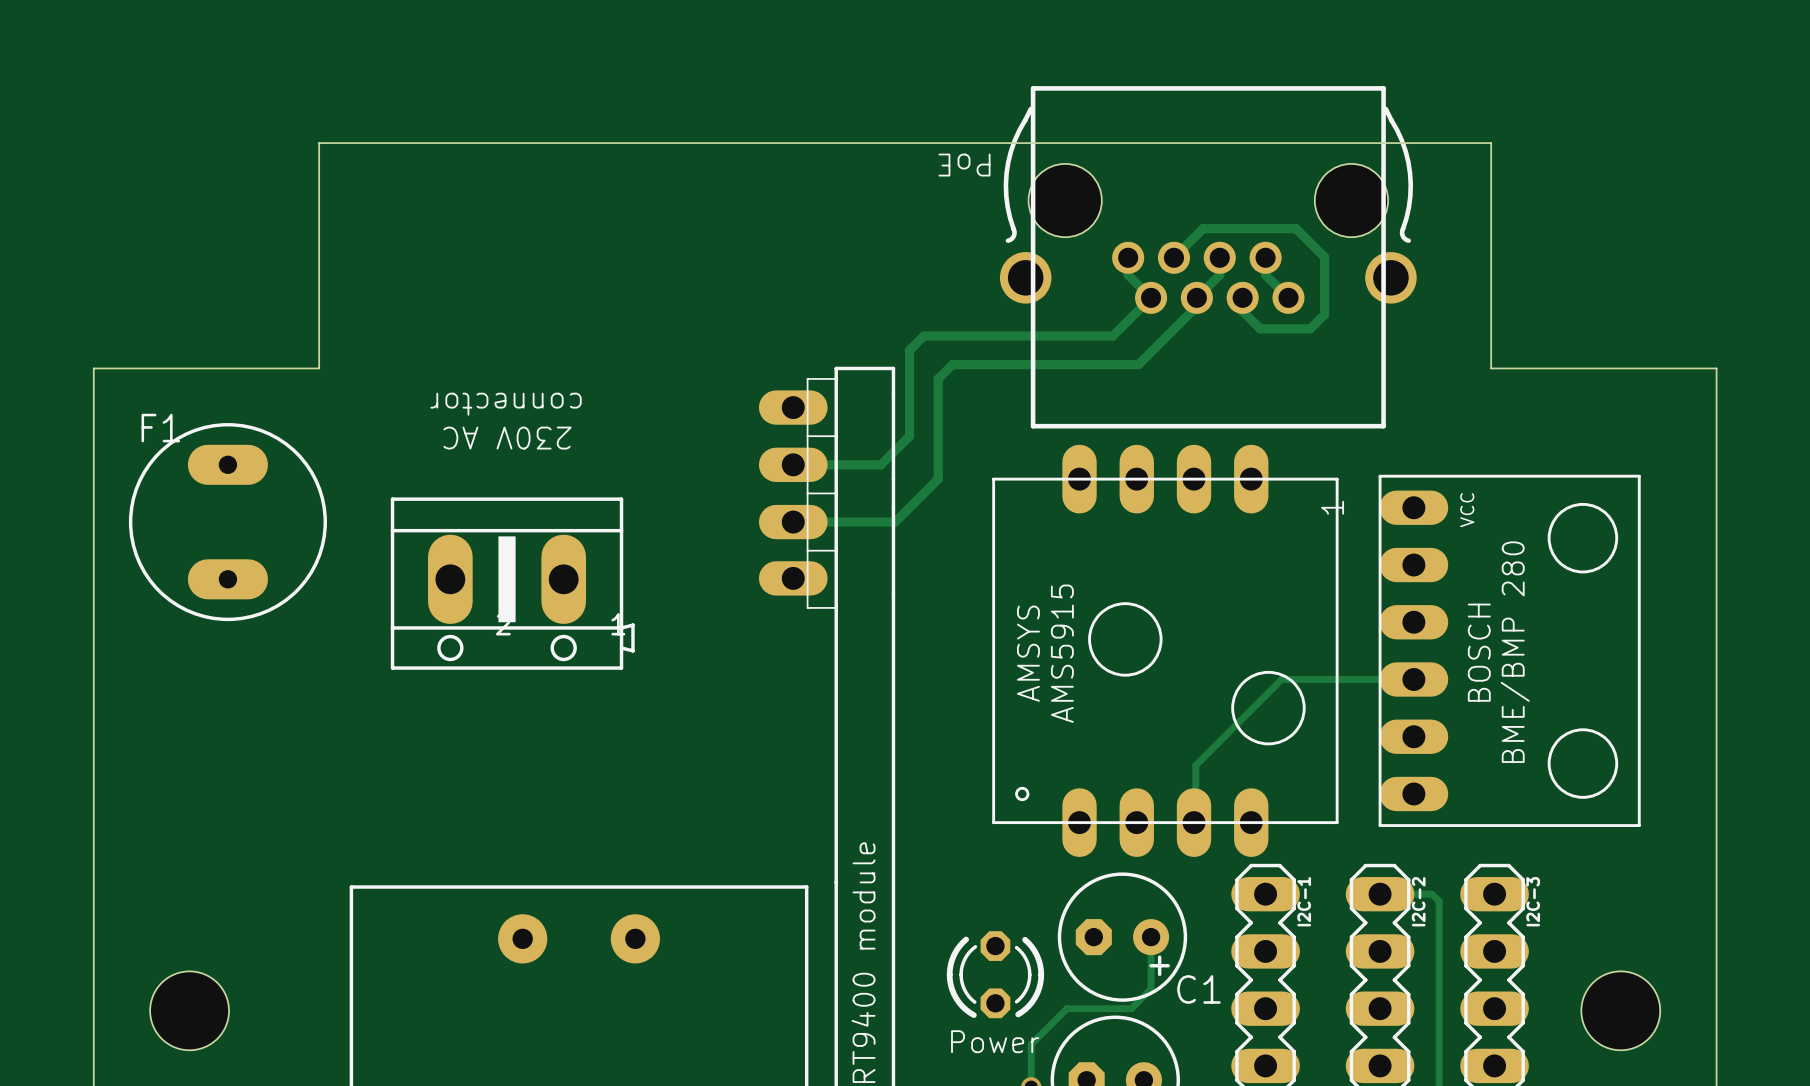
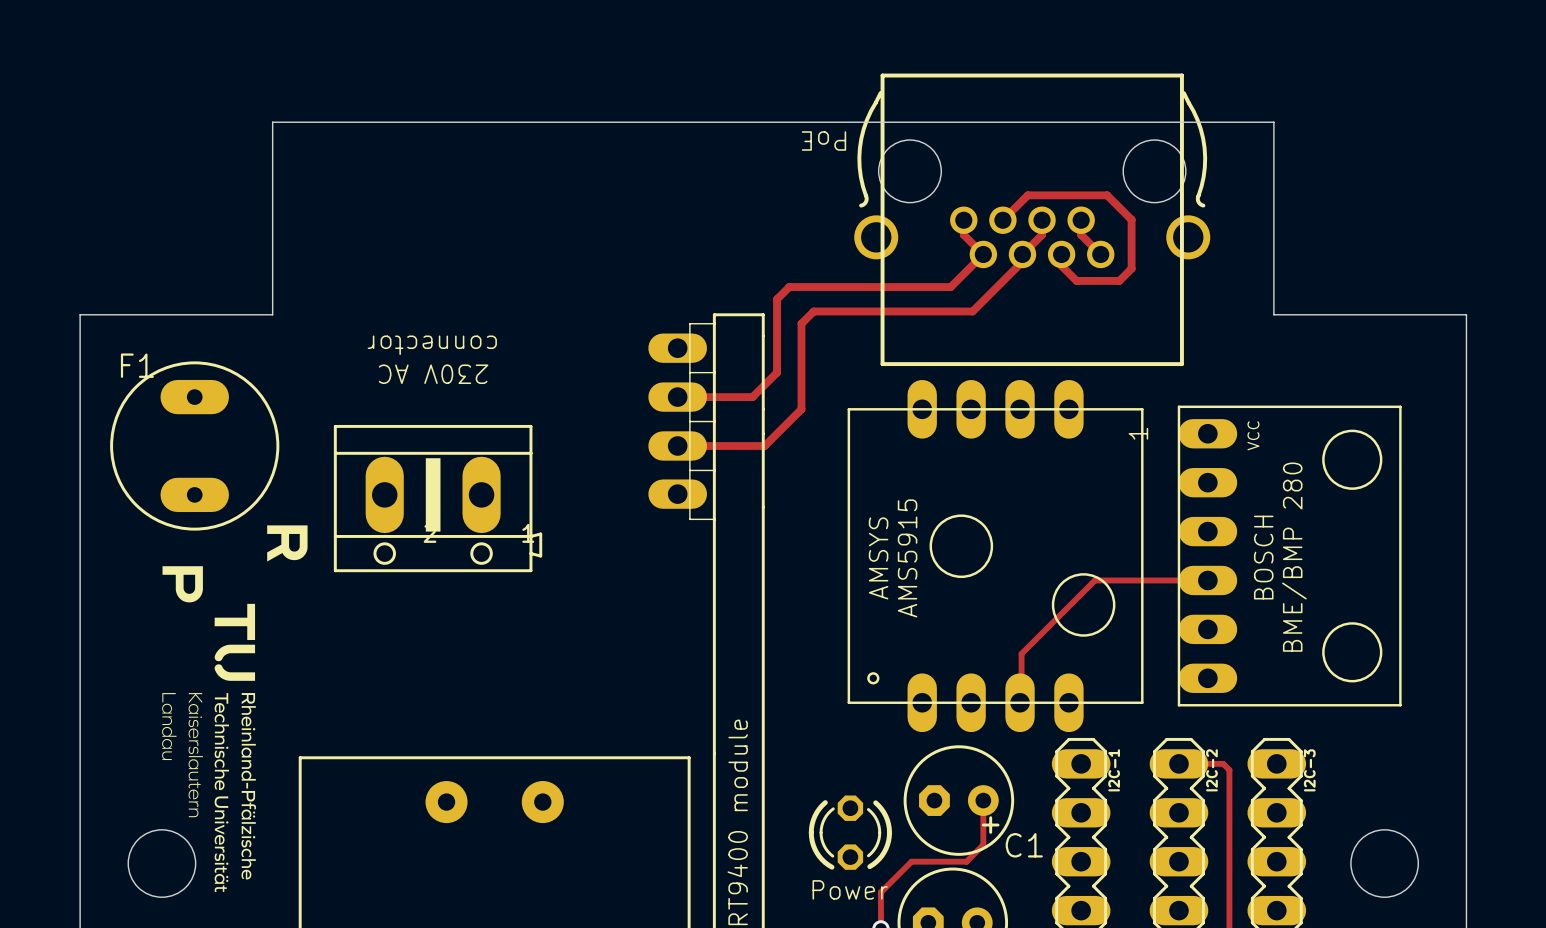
drawing: none -> [267, 525, 308, 562]
drawing: none -> [162, 566, 257, 892]

